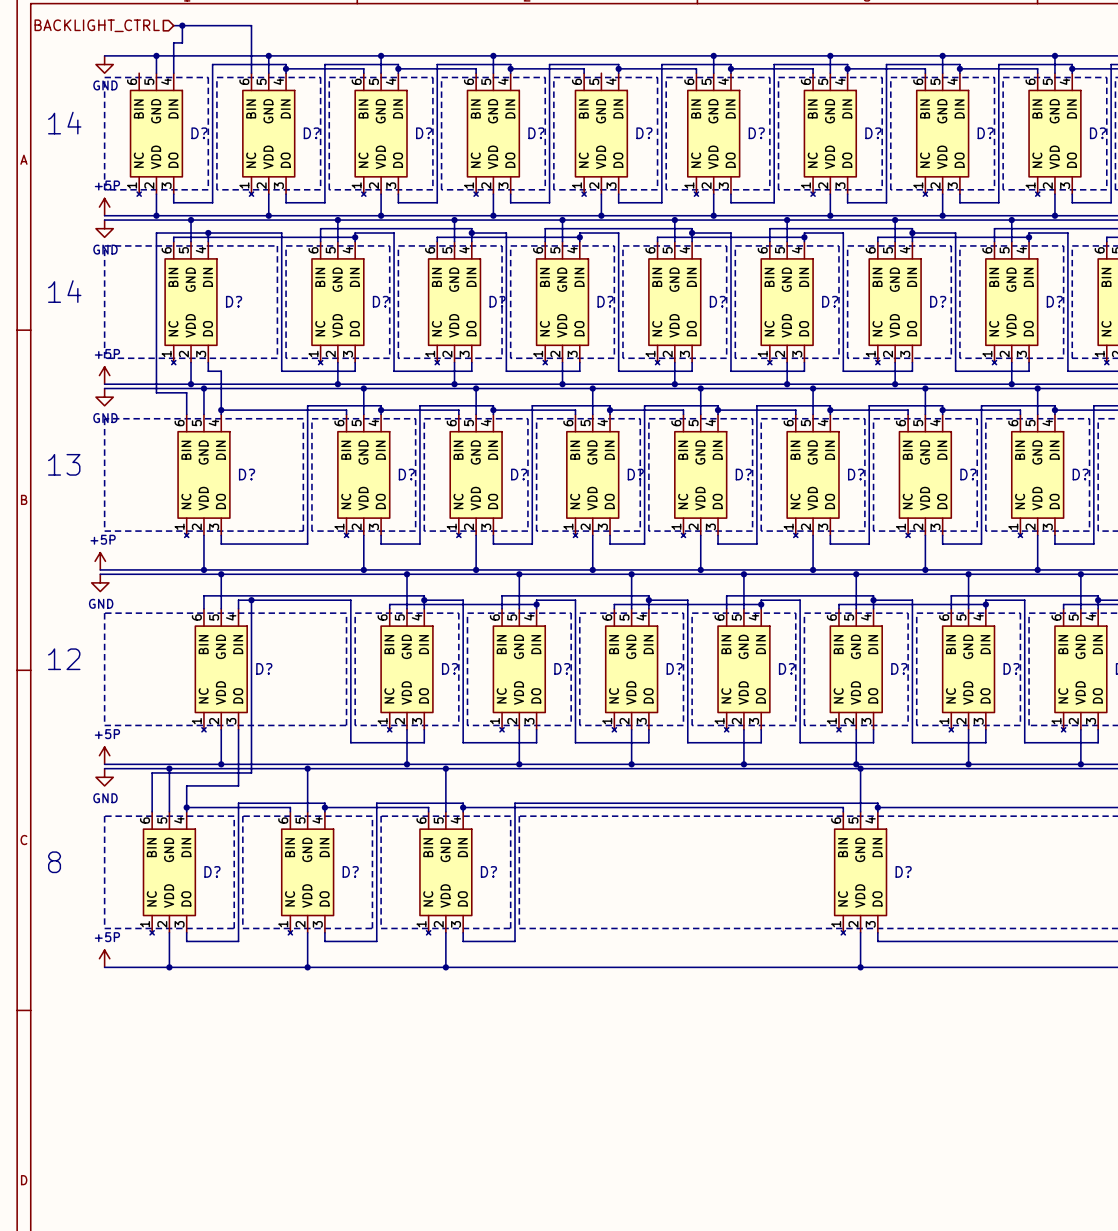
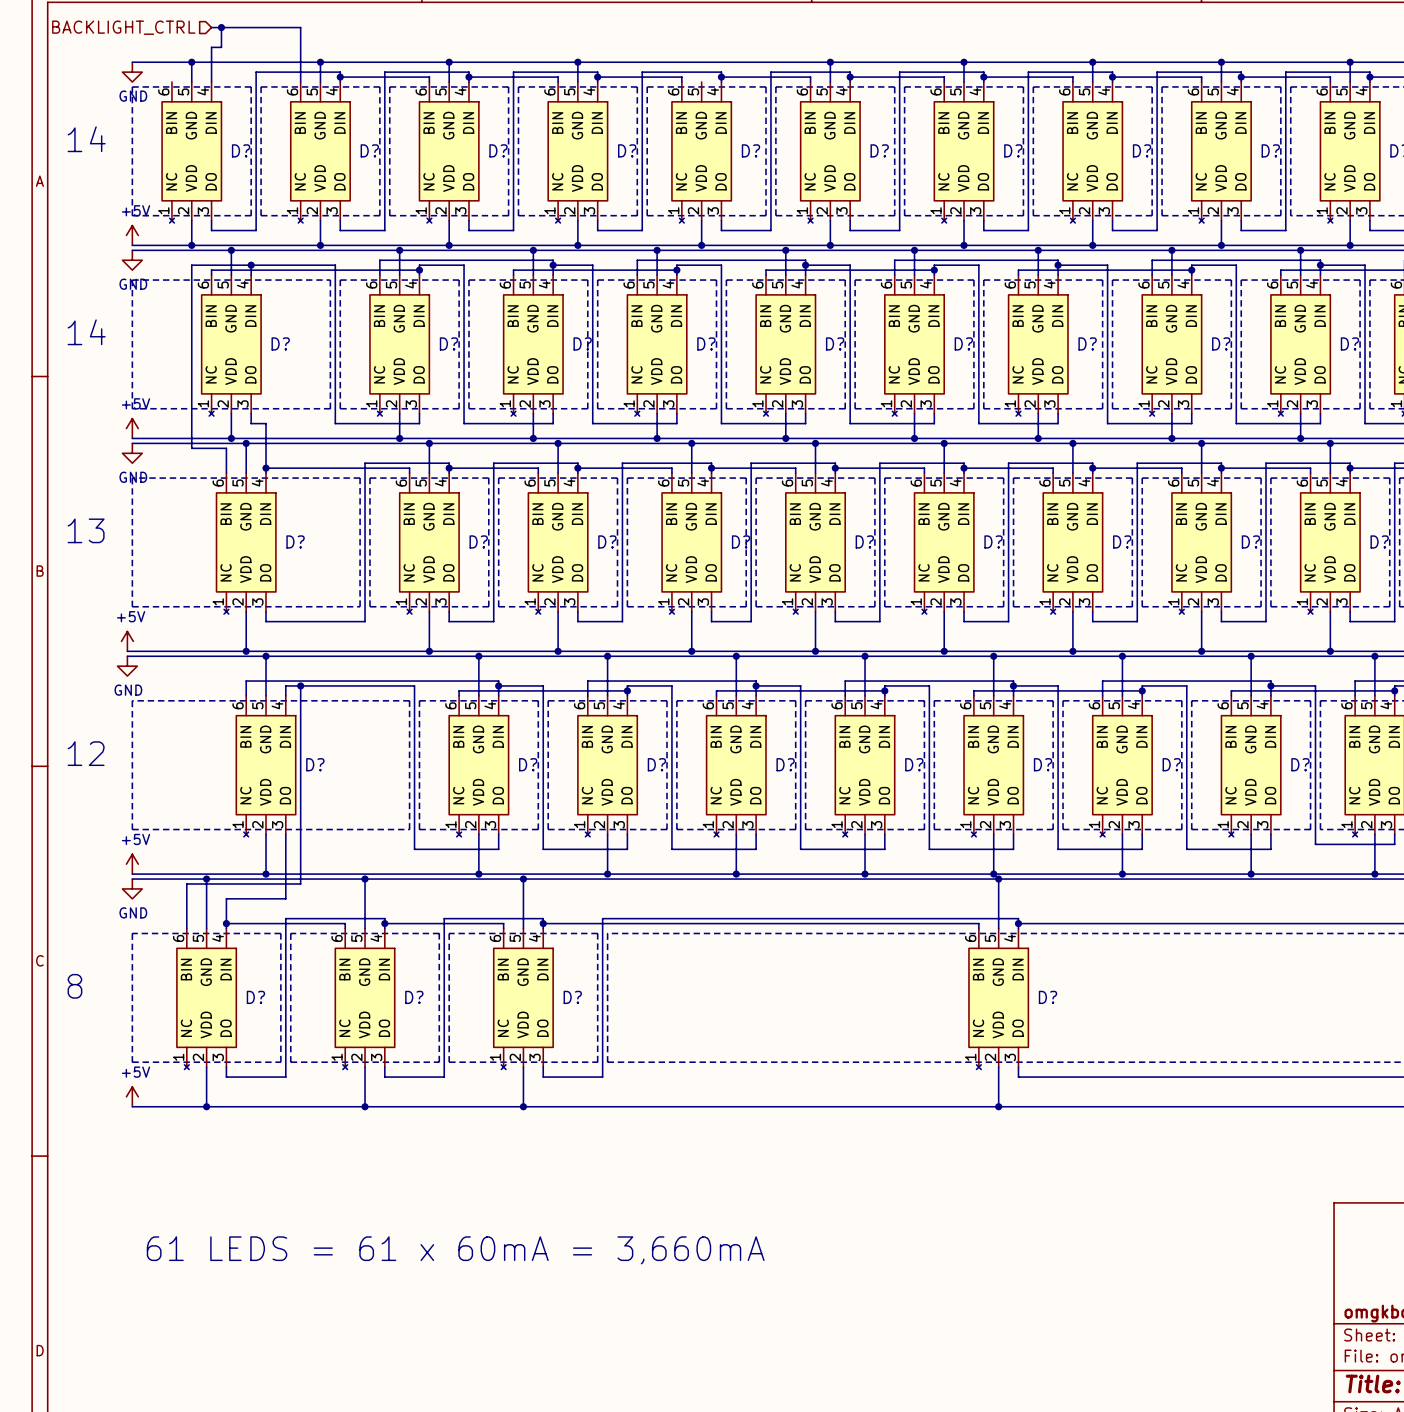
power symbol: +5P (104, 207) -> +5V (132, 235)
power symbol: +5P (104, 375) -> +5V (132, 428)
power symbol: +5P (100, 561) -> +5V (127, 641)
power symbol: +5P (104, 755) -> +5V (132, 864)
power symbol: +5P (104, 958) -> +5V (132, 1096)
text: none -> 61 LEDS = 61 x 60mA = 3,660mA (455, 1250)

